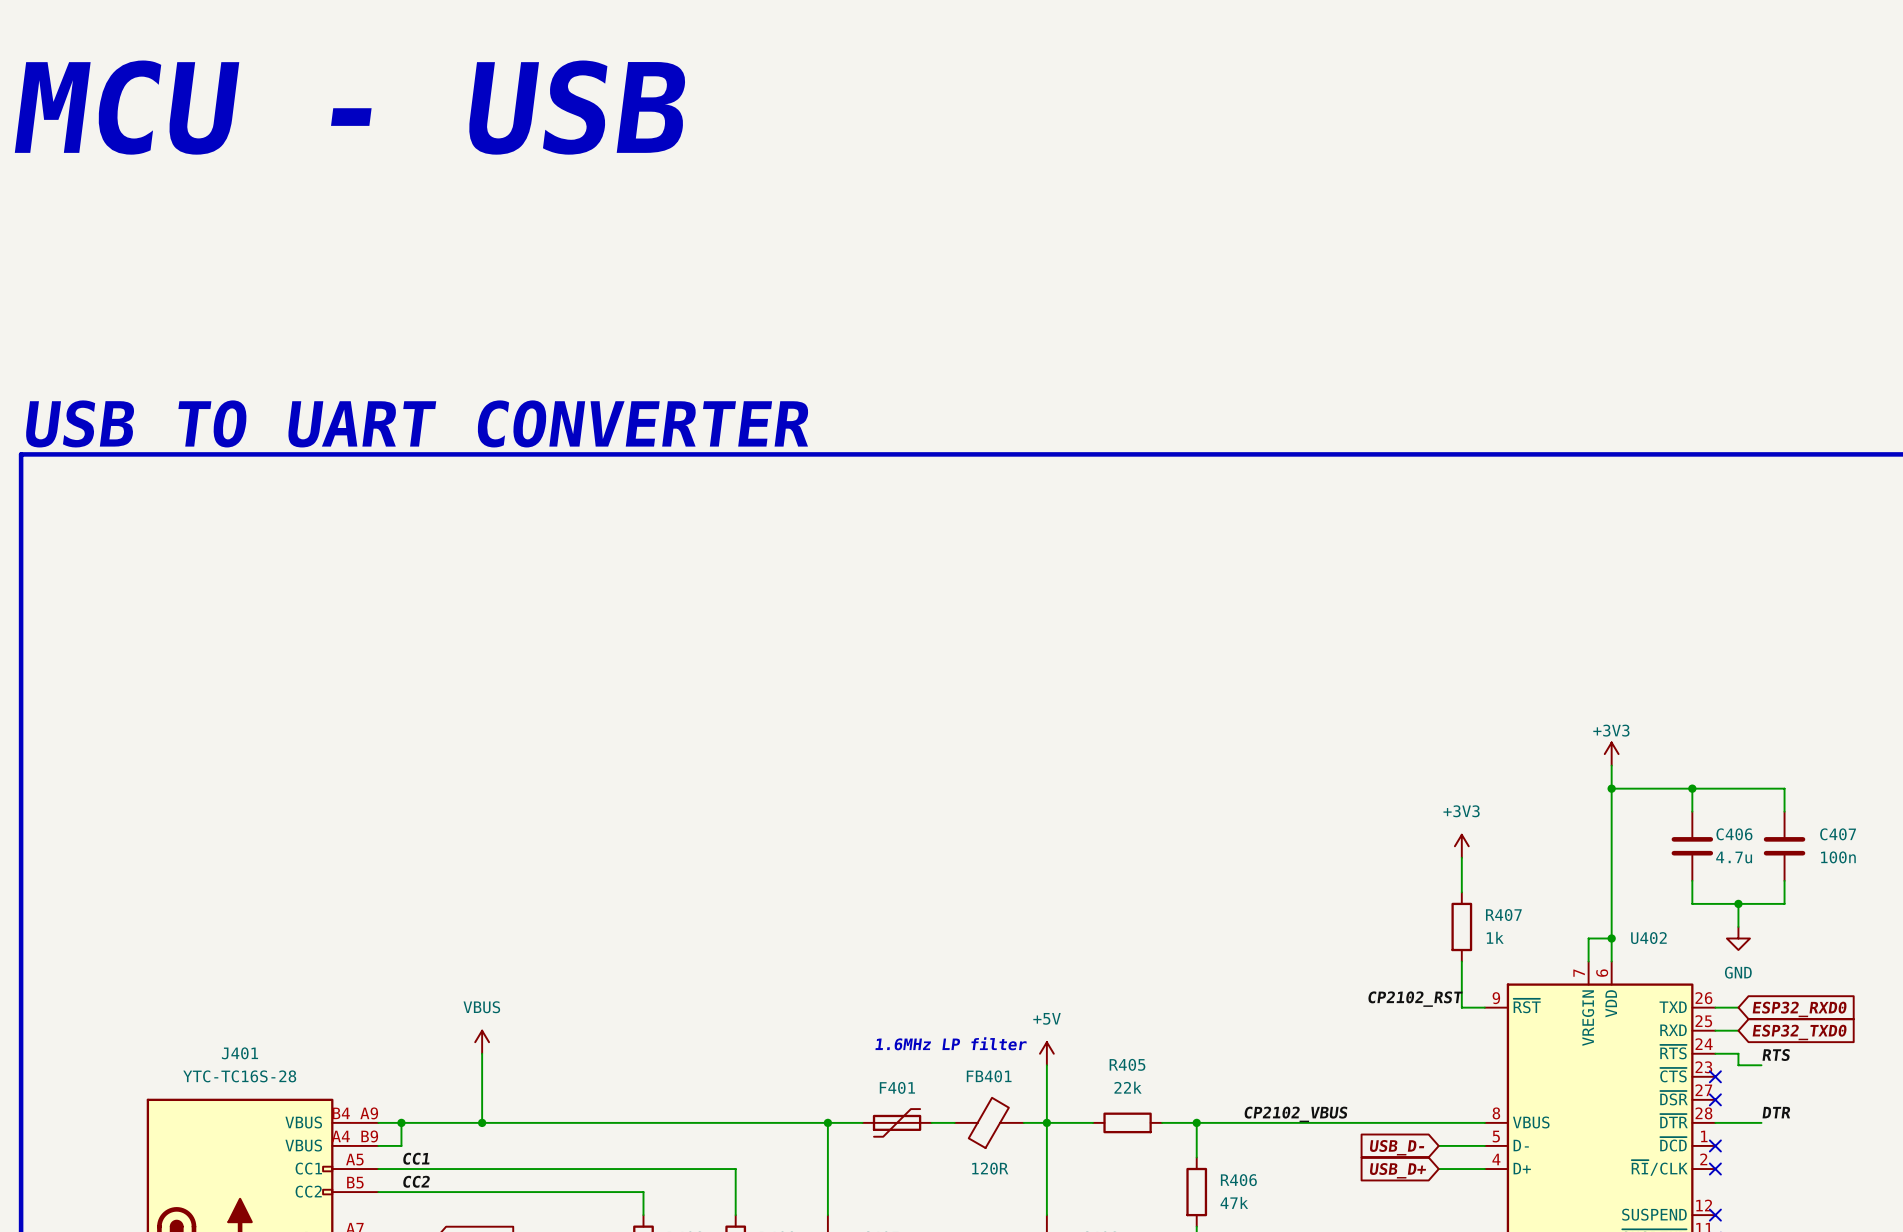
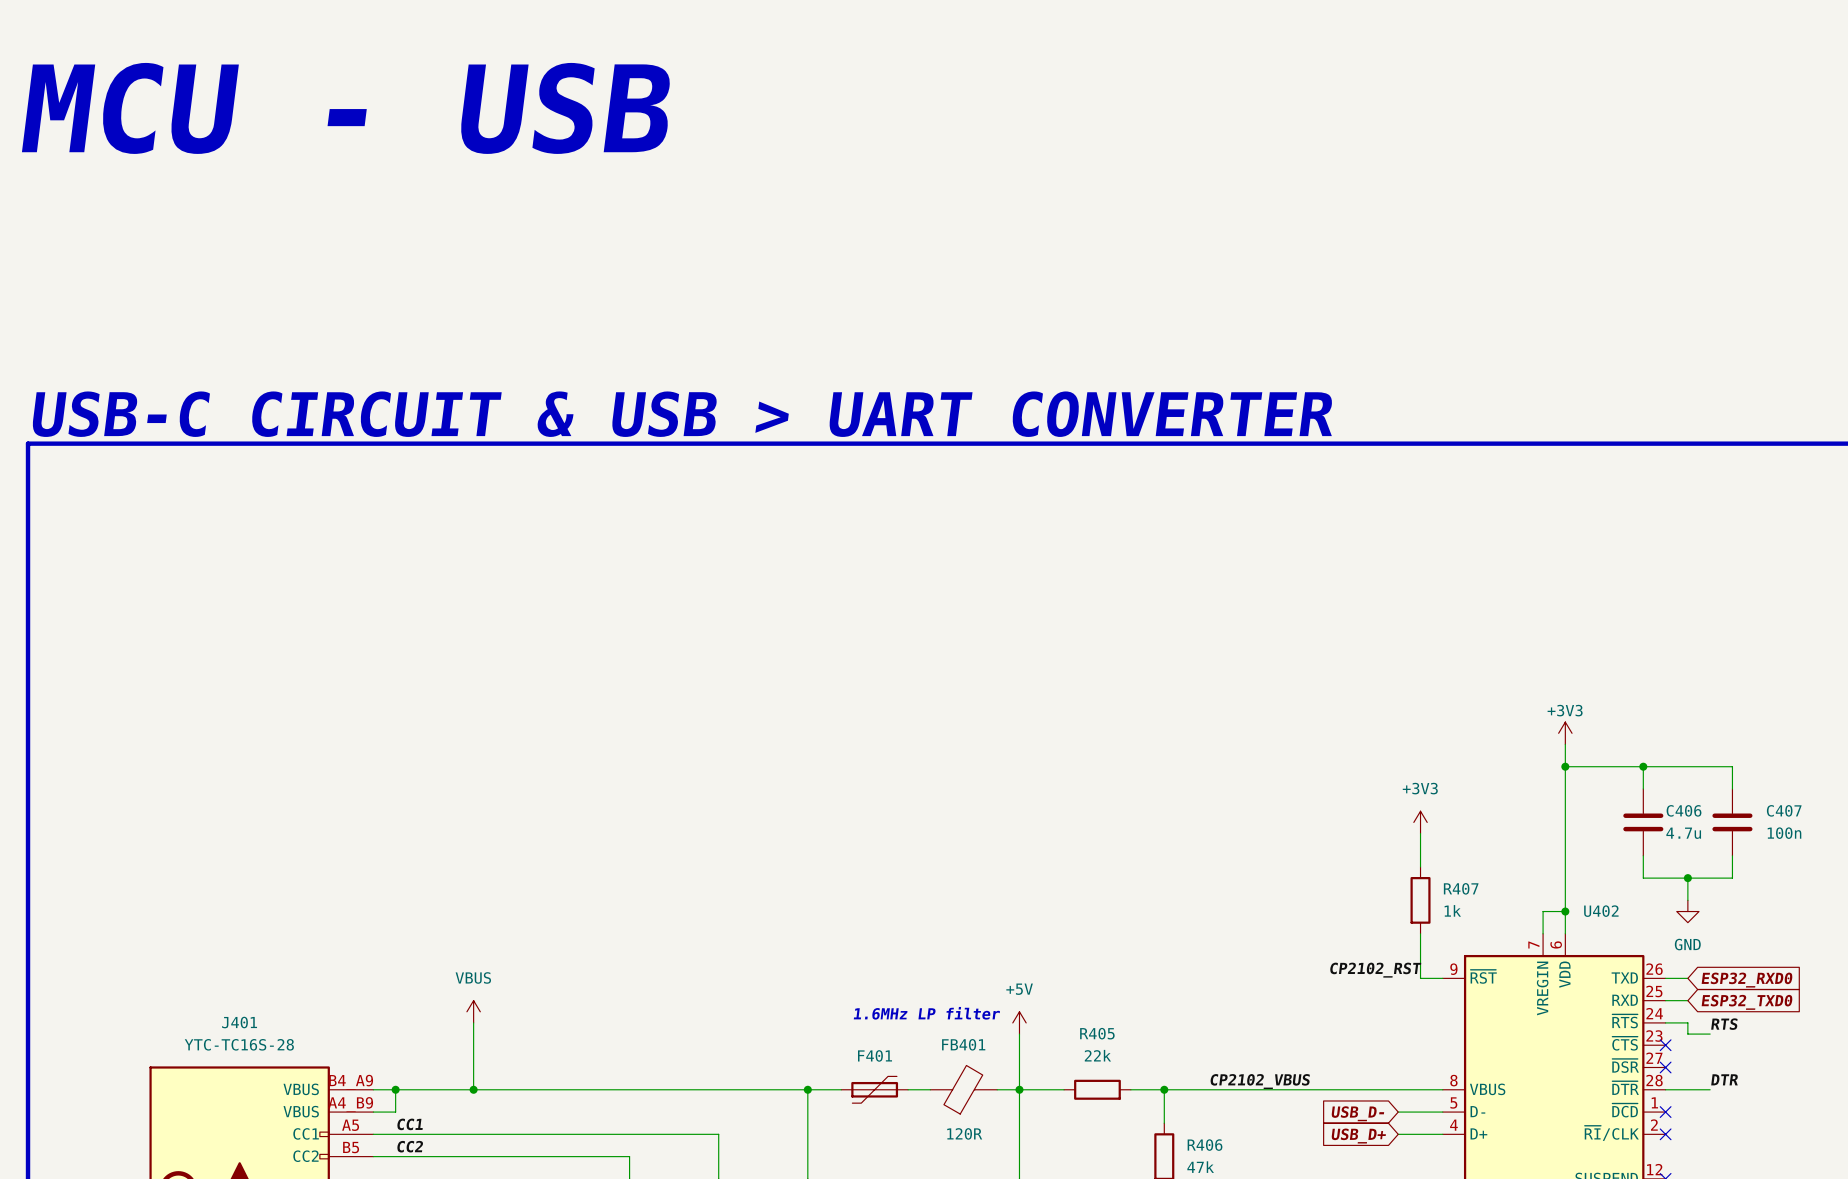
text: USB TO UART CONVERTER (417, 423) -> USB-C CIRCUIT & USB > UART CONVERTER (682, 414)

